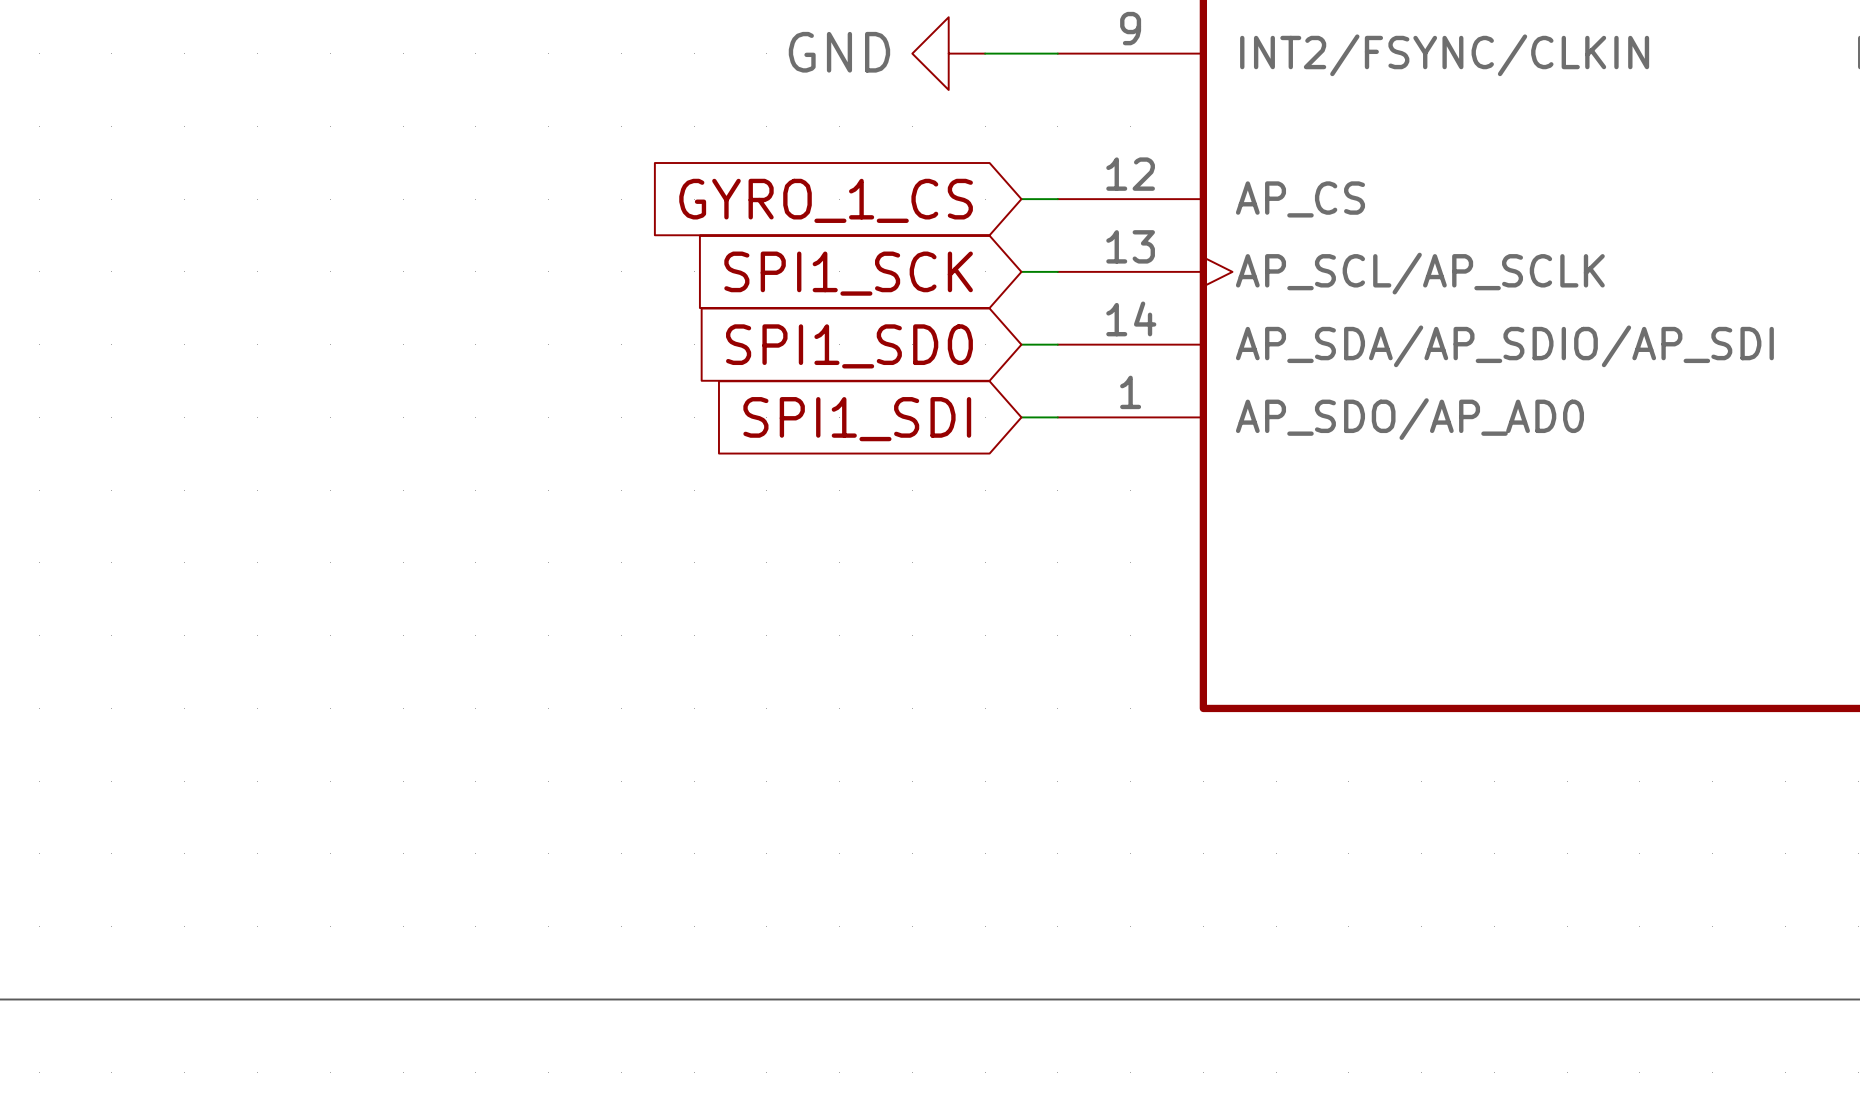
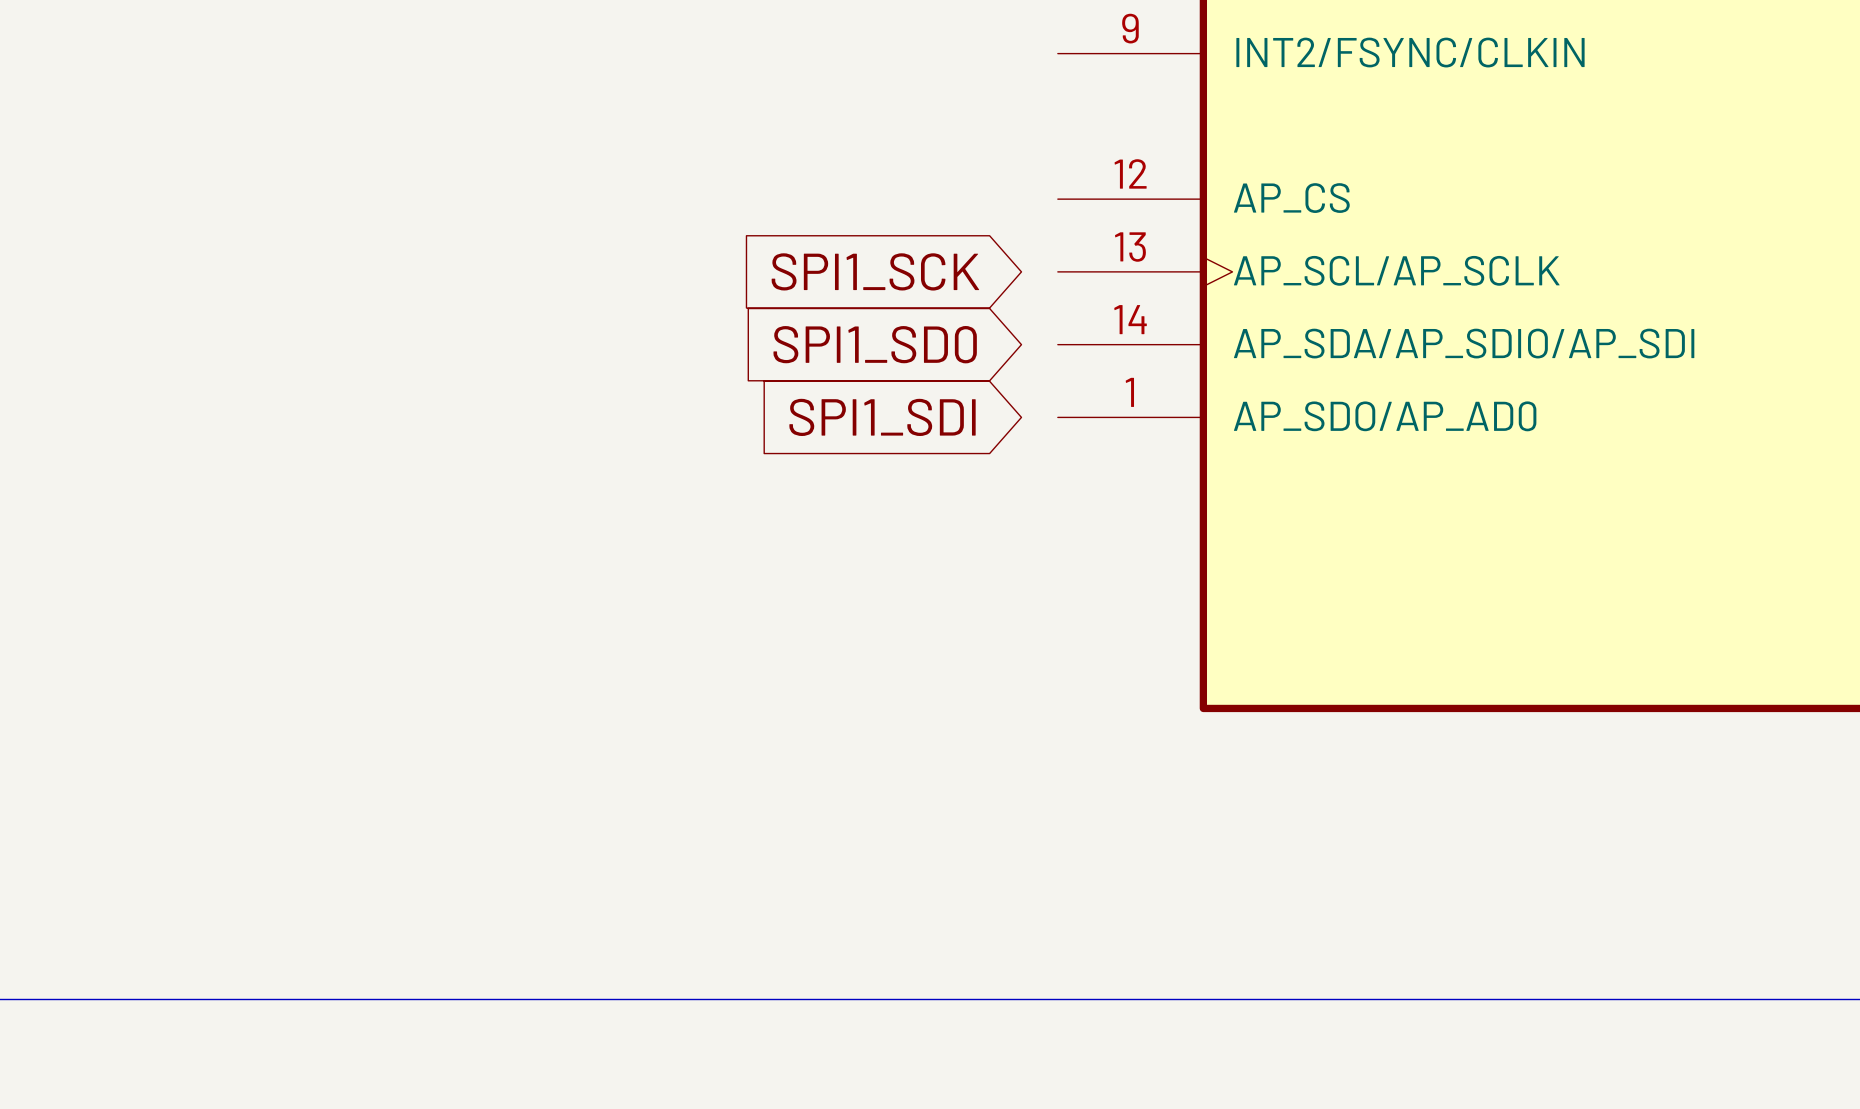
power symbol: GND (948, 53) -> none
wire: (985, 53) (1057, 53) -> none
wire: (1021, 199) (1057, 199) -> none
global label: GYRO_1_CS (826, 200) -> none
wire: (1021, 271) (1057, 271) -> none
wire: (1021, 344) (1057, 344) -> none
wire: (1021, 417) (1057, 417) -> none

